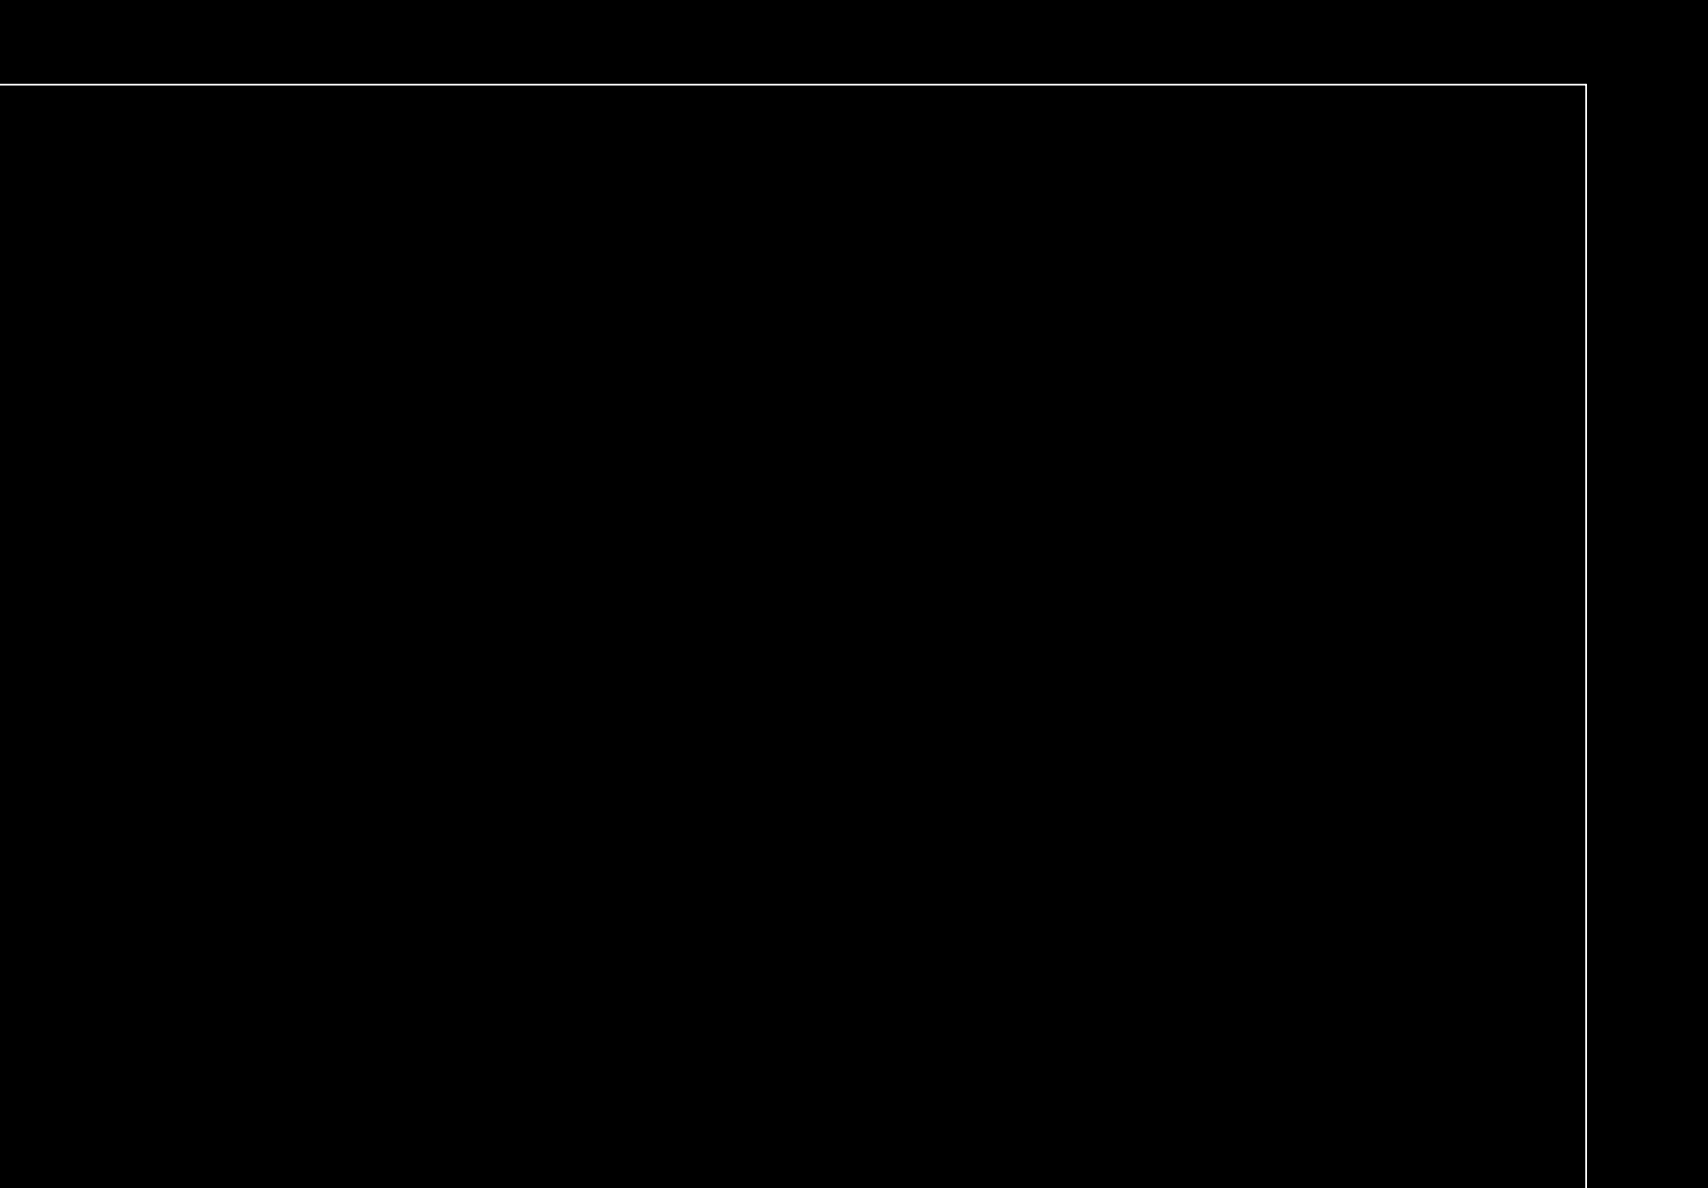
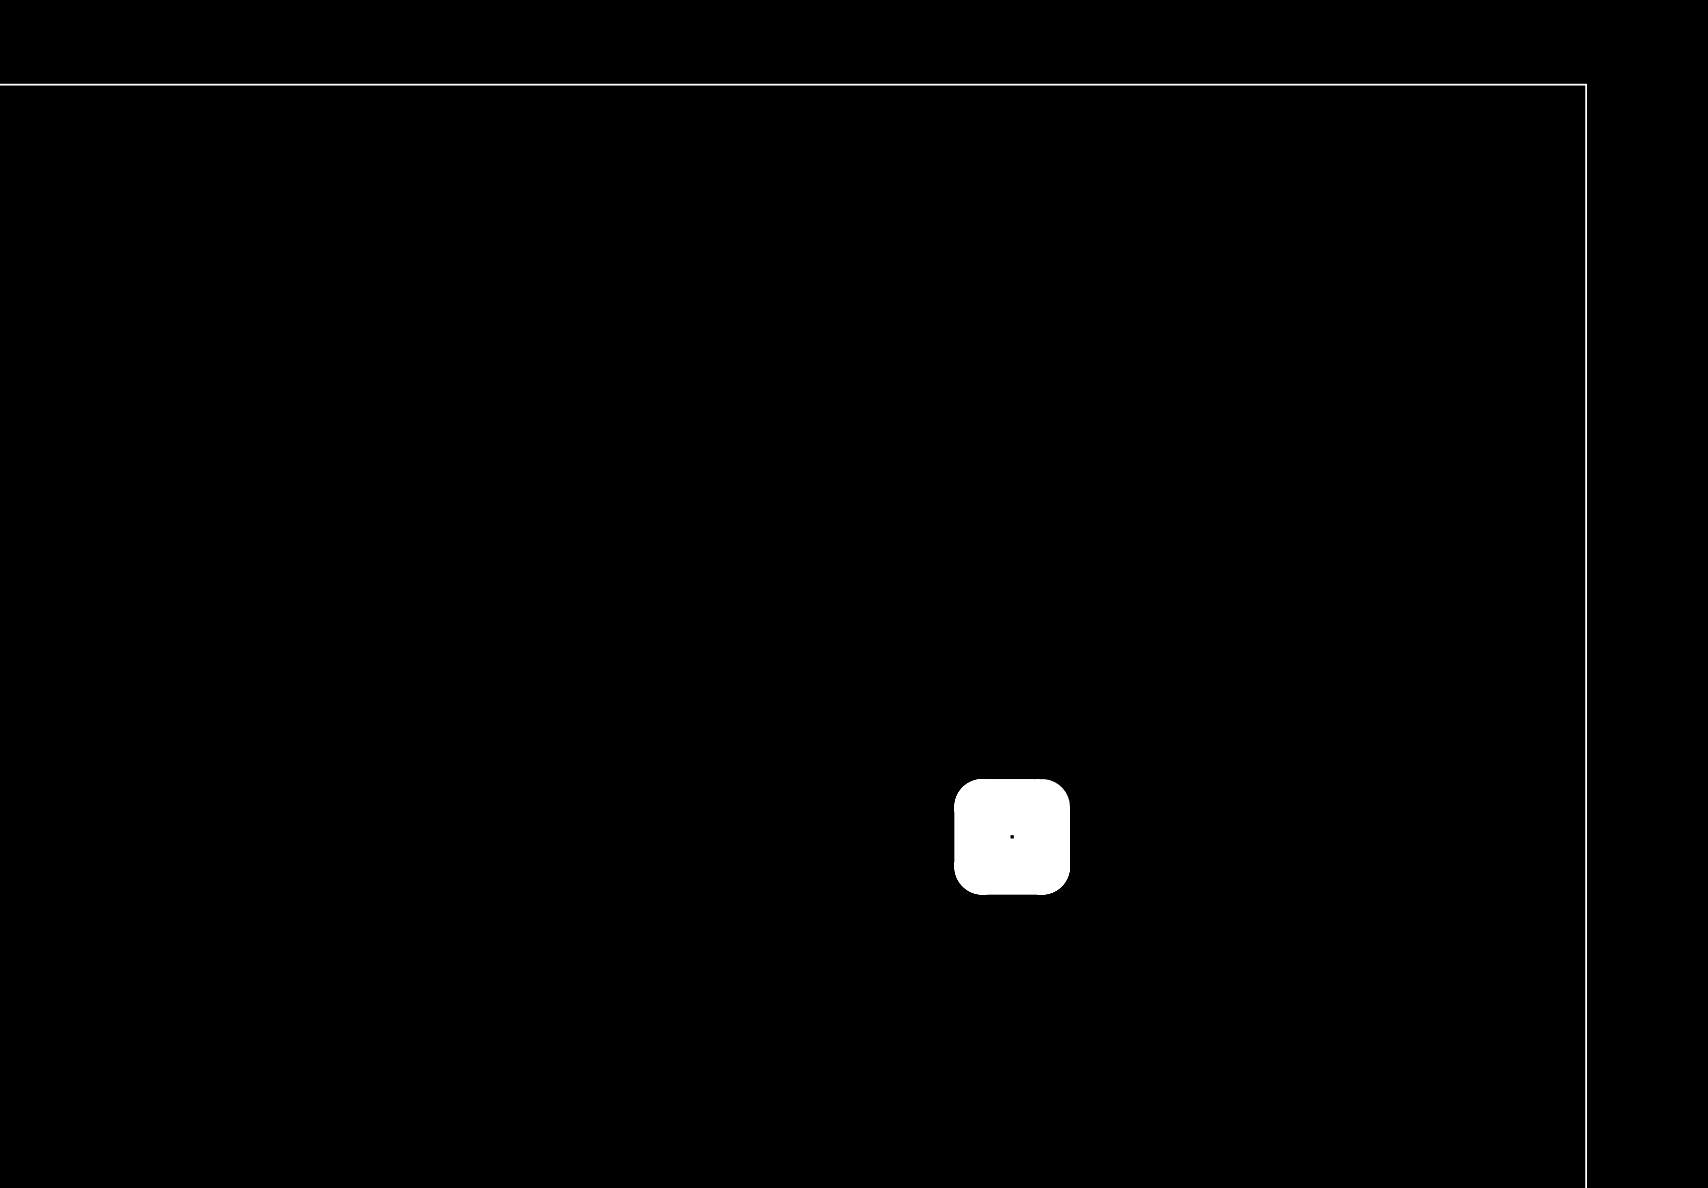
board edge: none -> (1041, 807) (1041, 866) (982, 866) (982, 807) (1033, 807)

